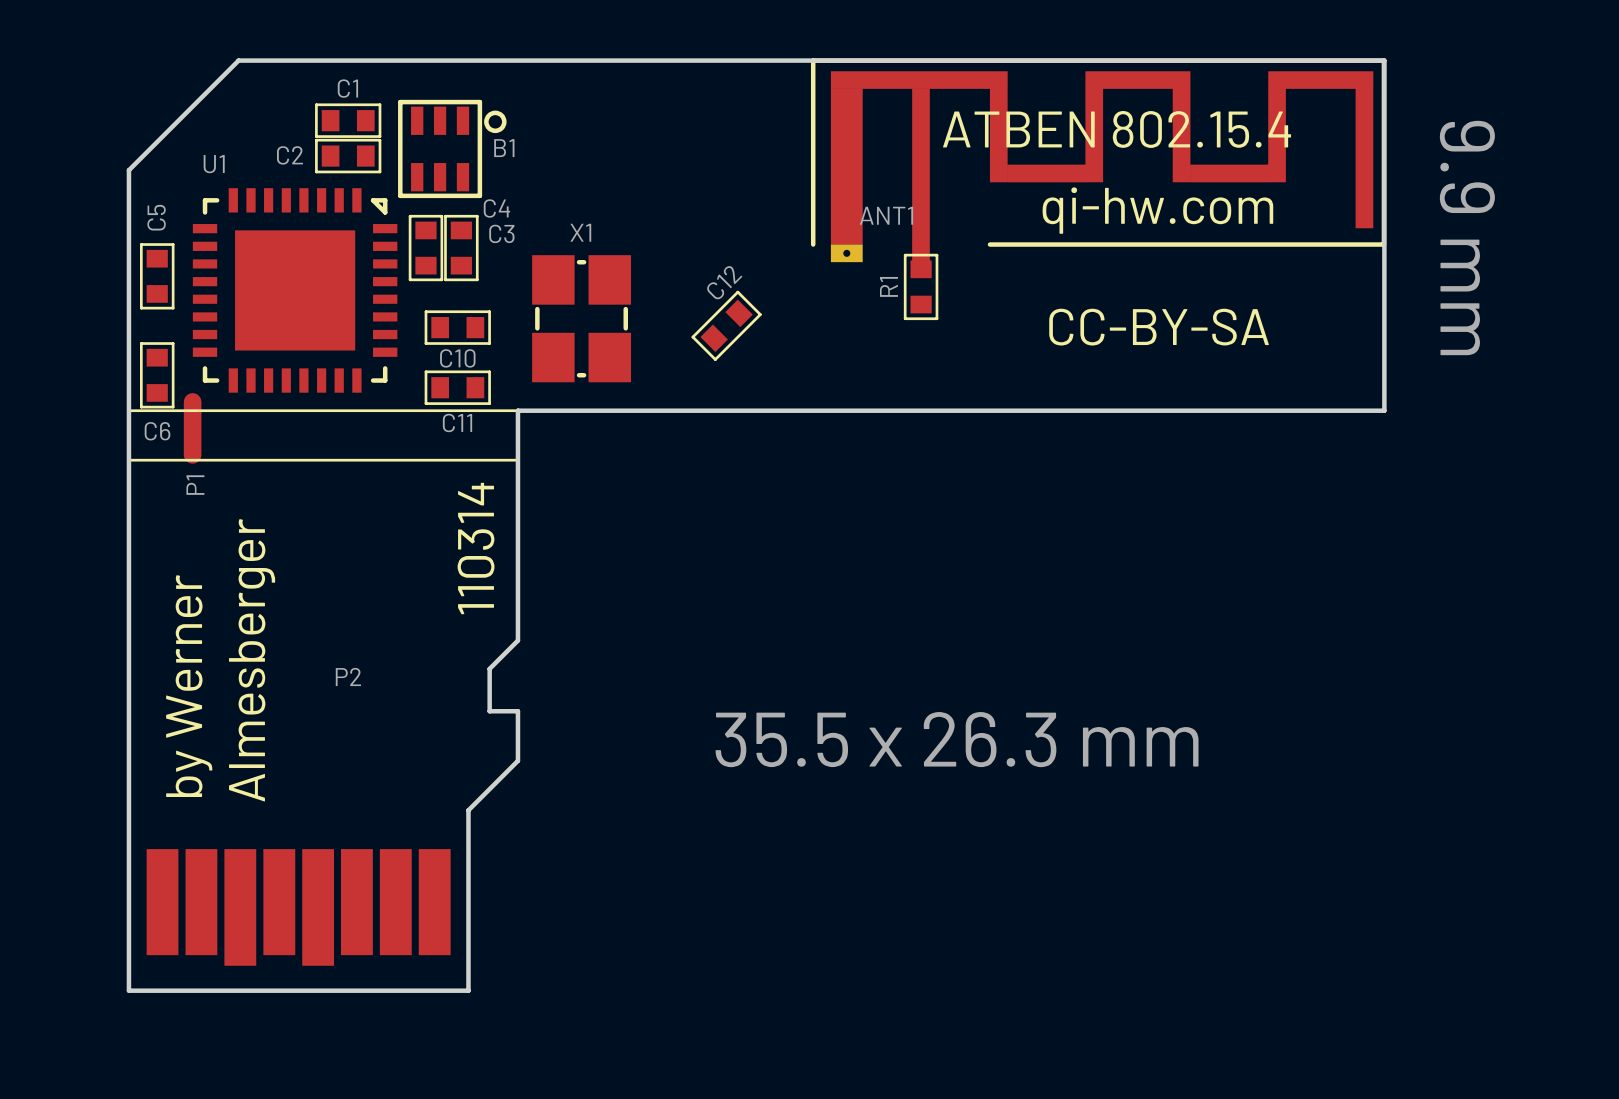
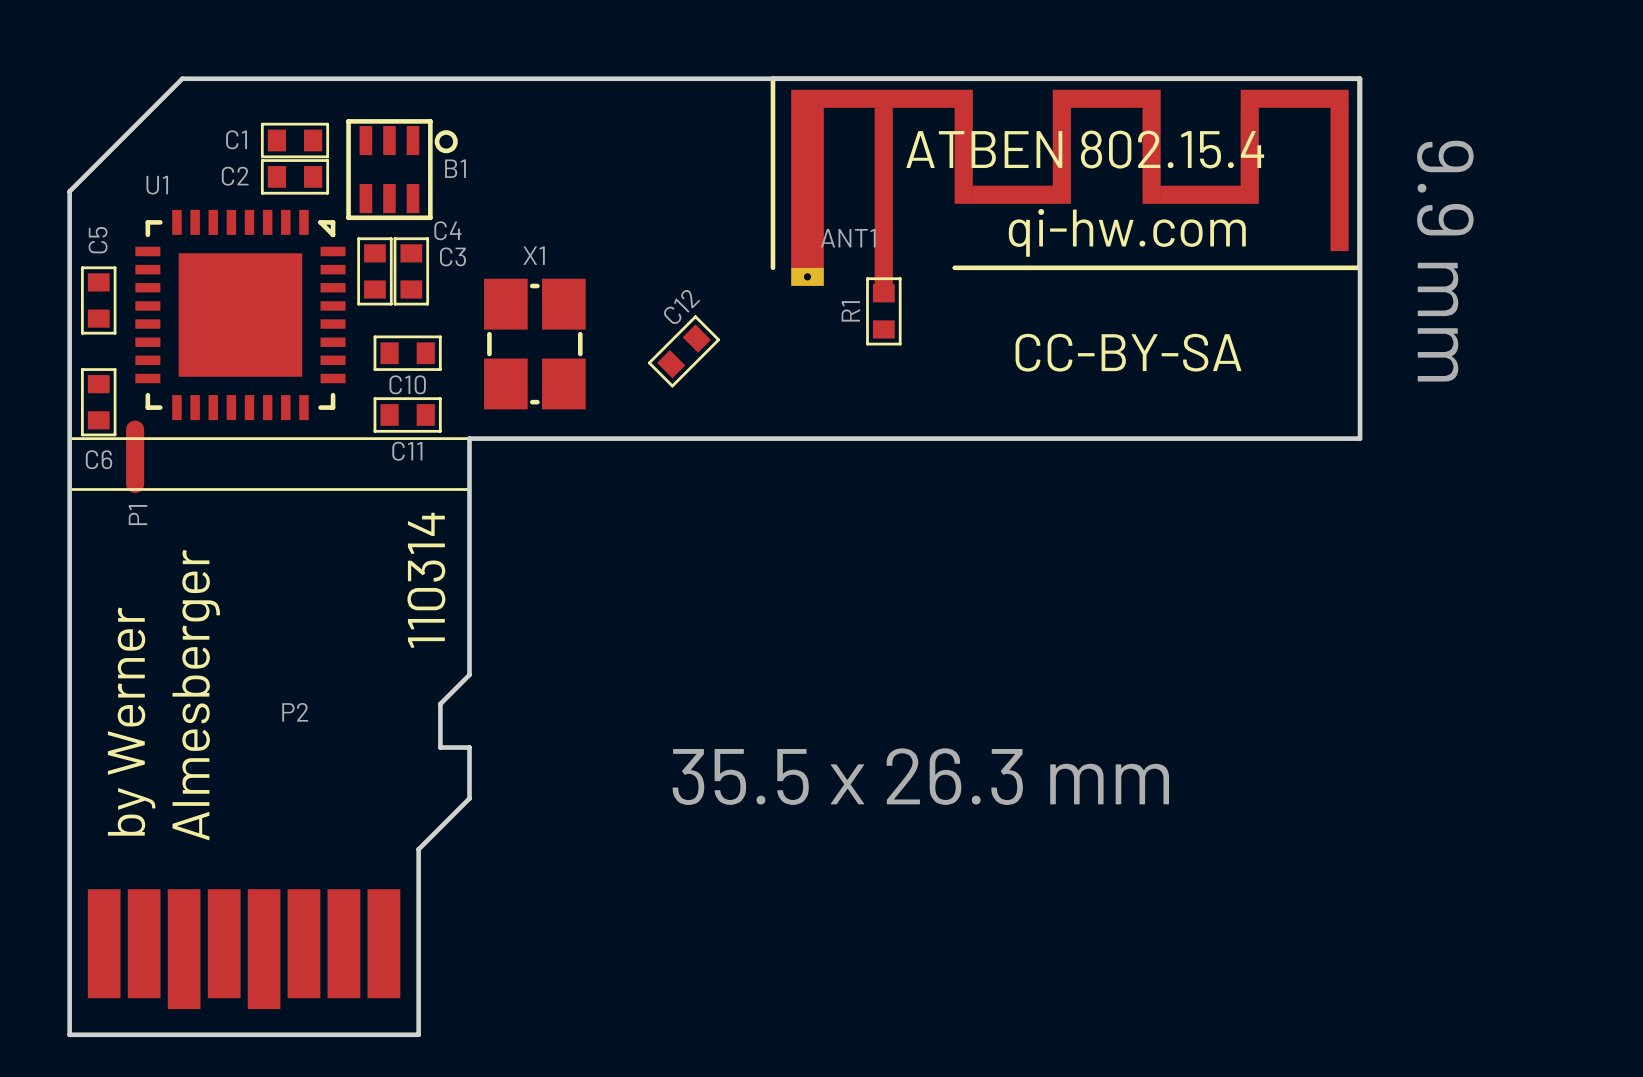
C1 name position: C1 (347, 88) -> C1 (236, 139)

